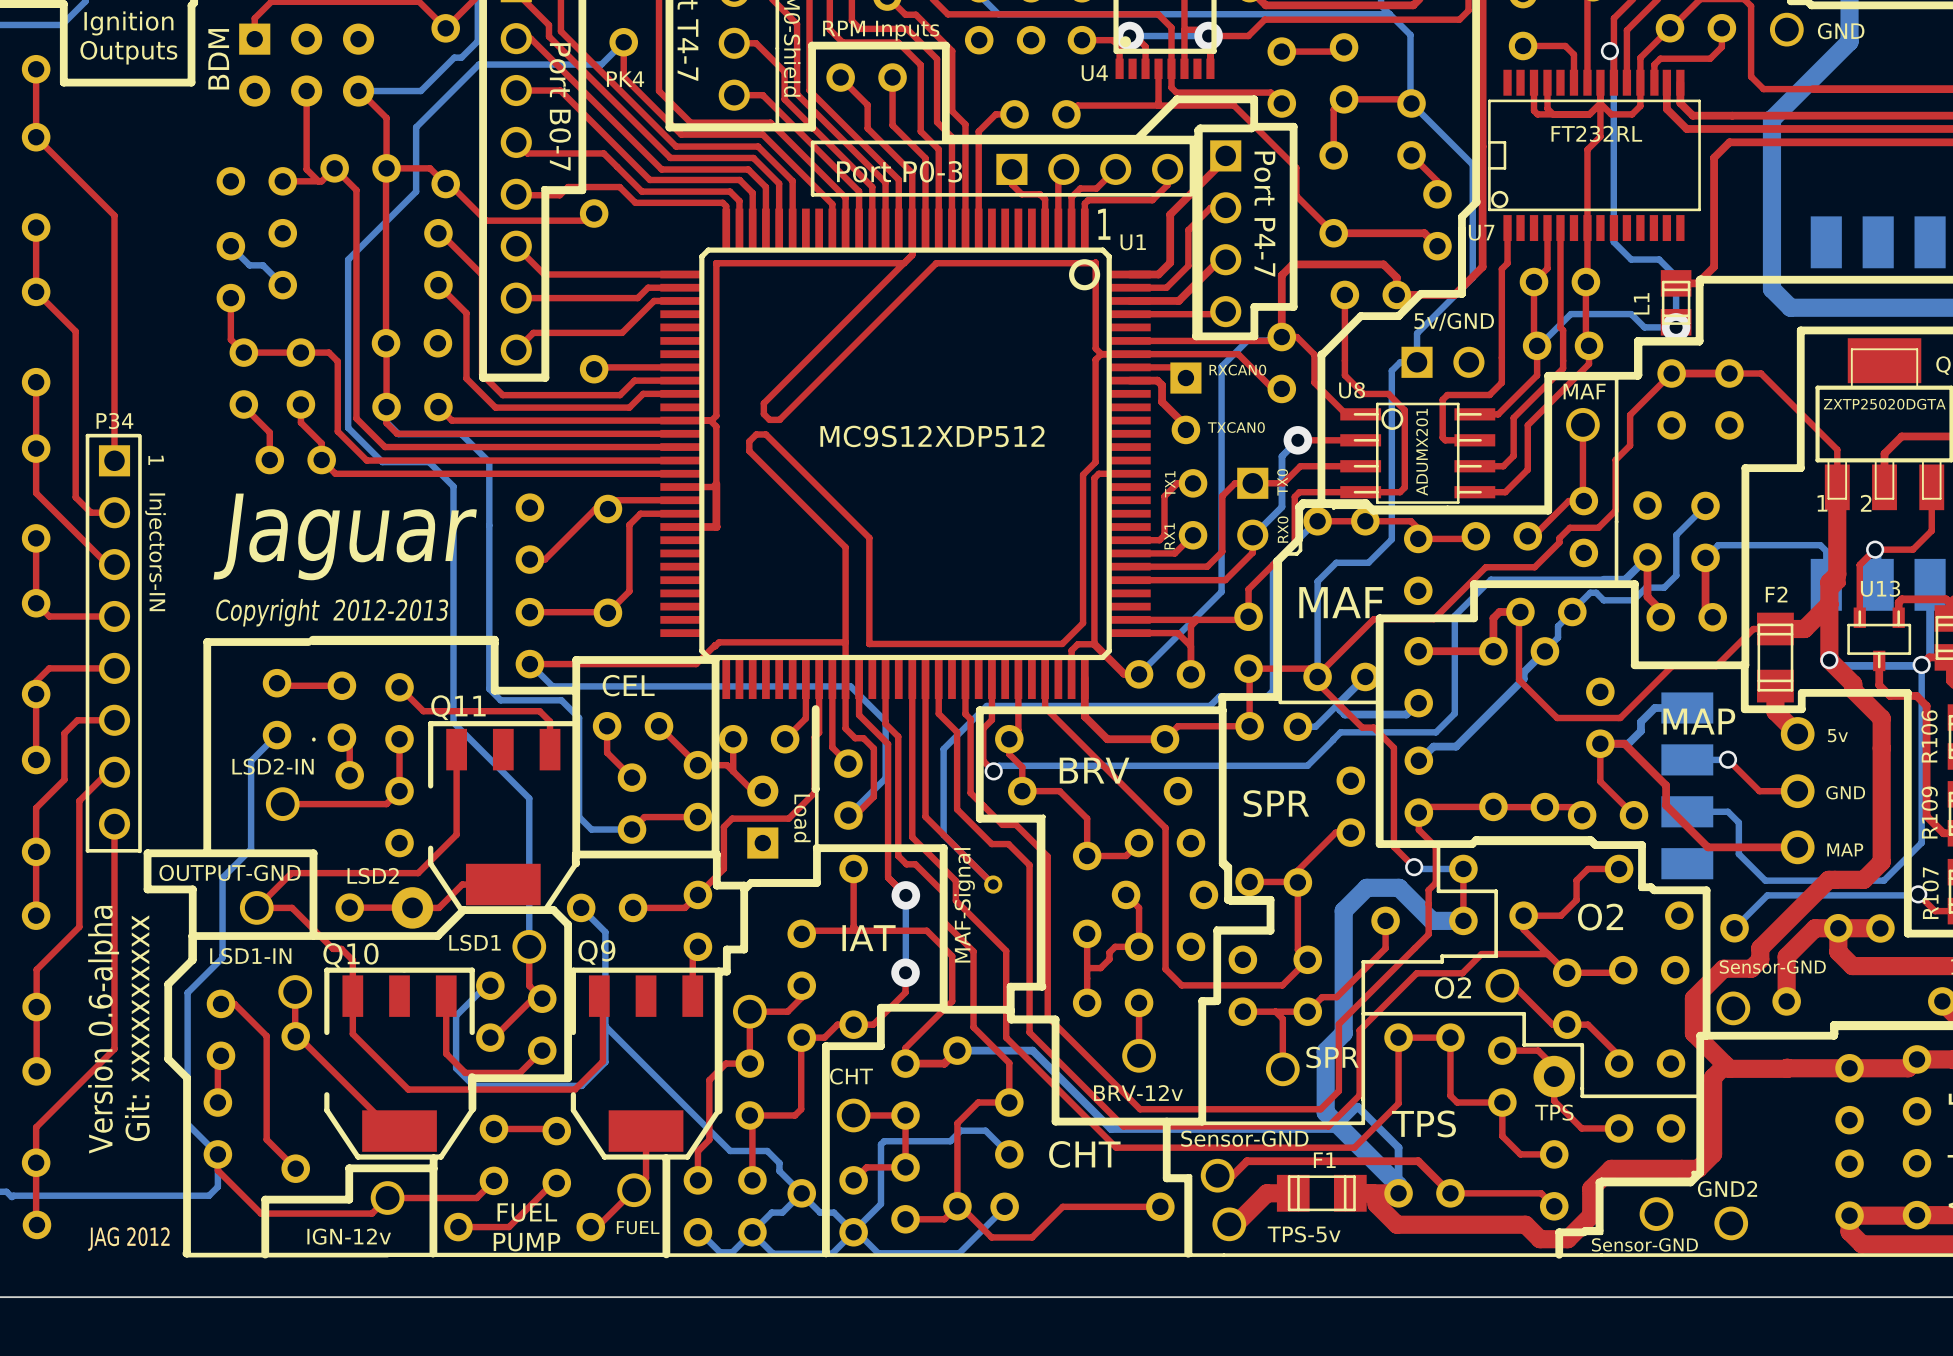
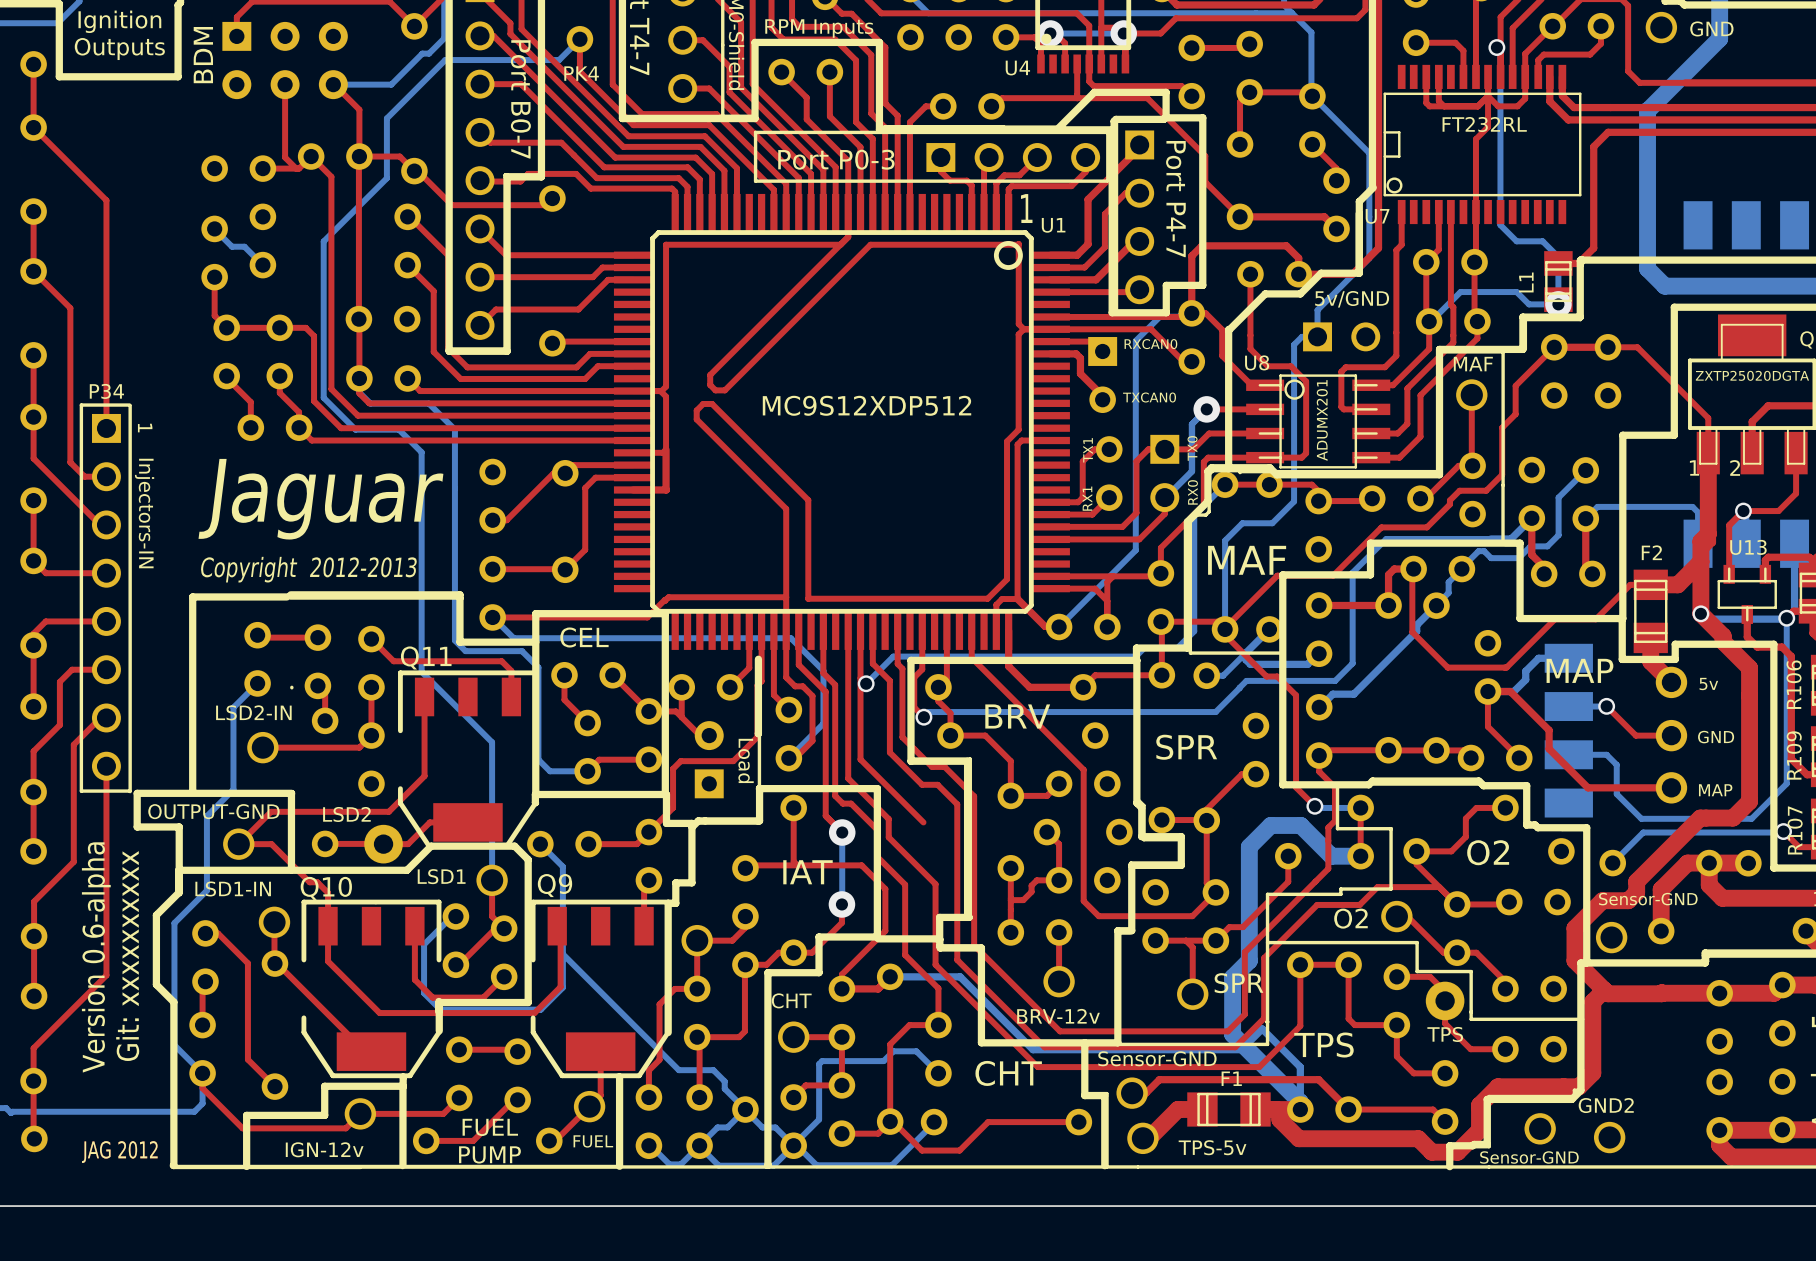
bottom track: (1317, 521) (1272, 564) (1272, 690) (1267, 696) (1219, 696) (1210, 705) (986, 705) (943, 749) (943, 834) (993, 884) -> (1225, 484) (1194, 515) (1194, 631) (1177, 648) (1144, 648) (1135, 656) (893, 656) (866, 683)
via: none -> (866, 683)
part: (993, 884) -> none
text: MAF-Signal (964, 905) -> none

